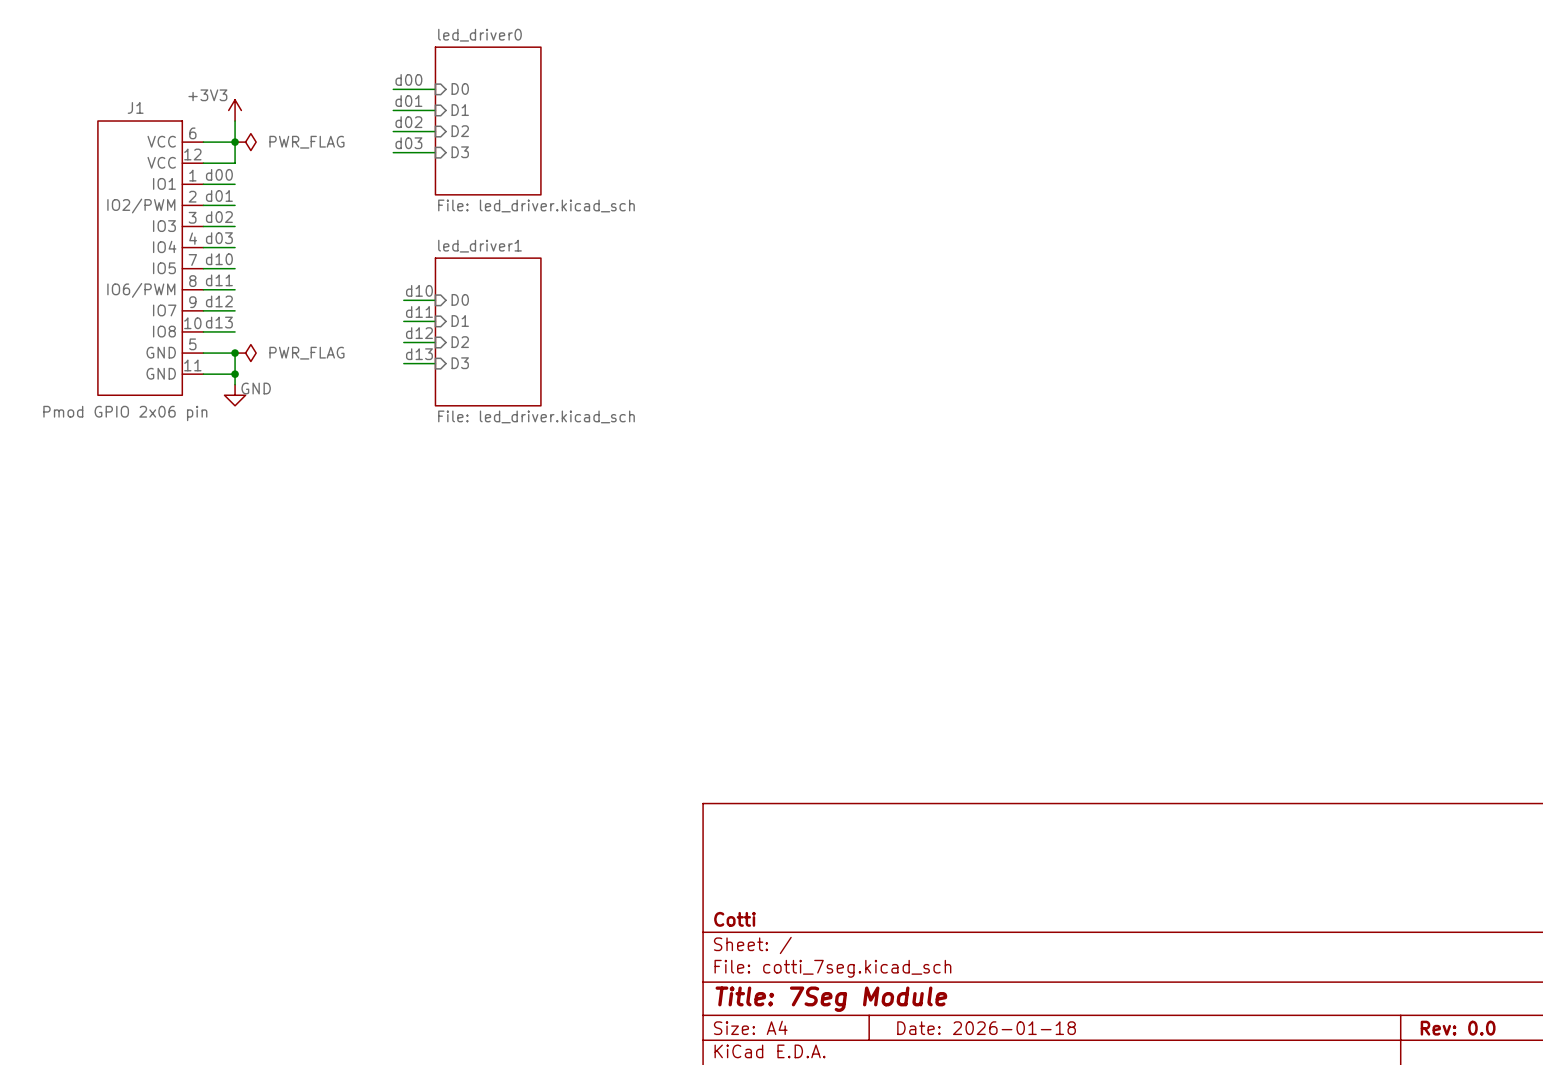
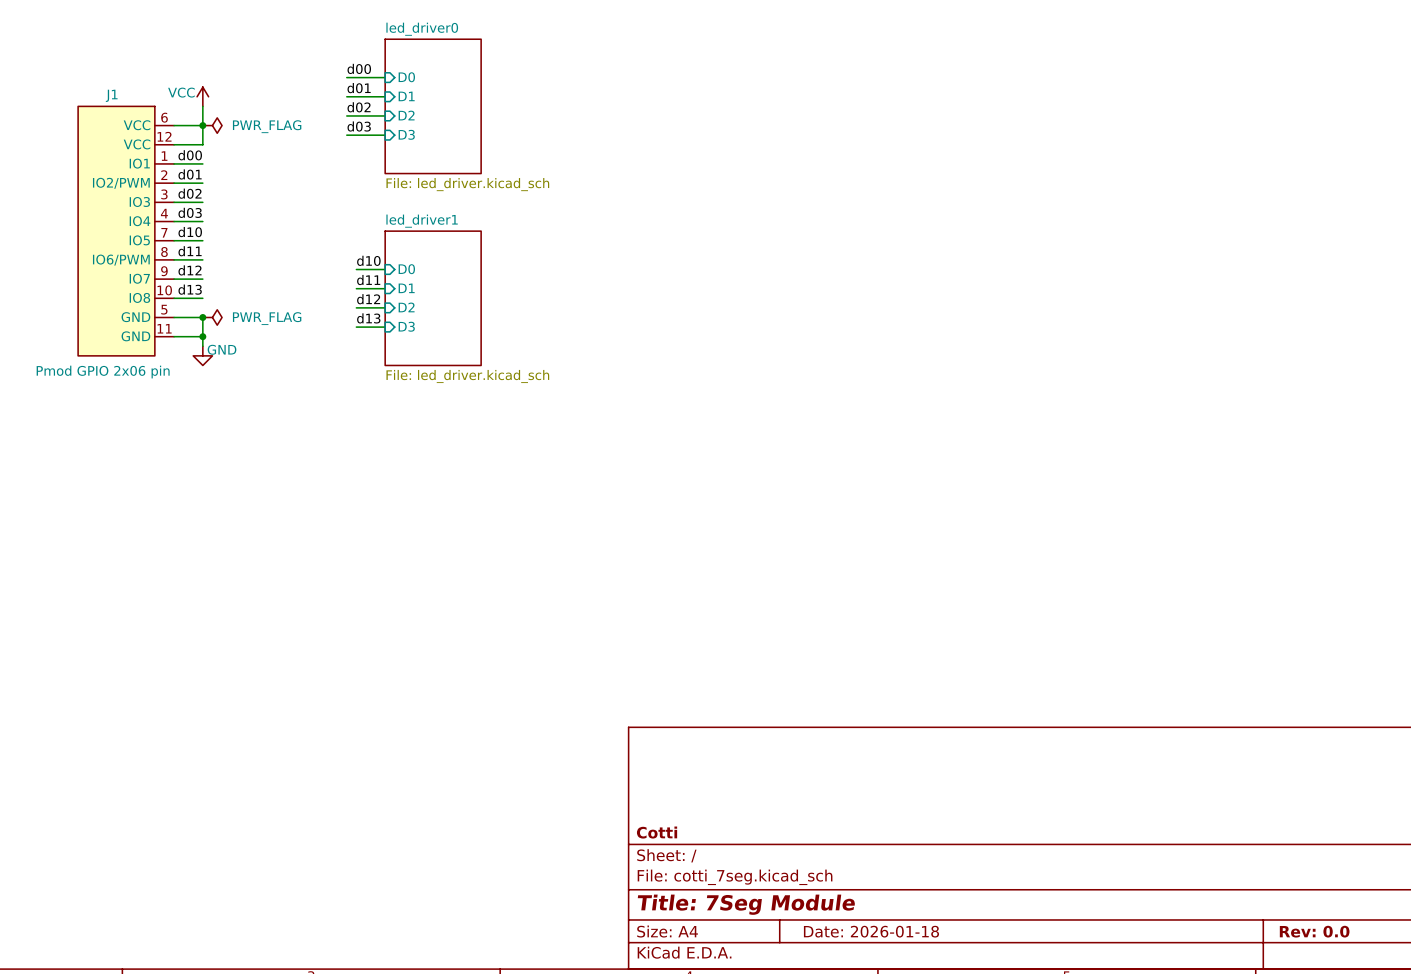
power symbol: +3V3 (235, 110) -> VCC (202, 96)

